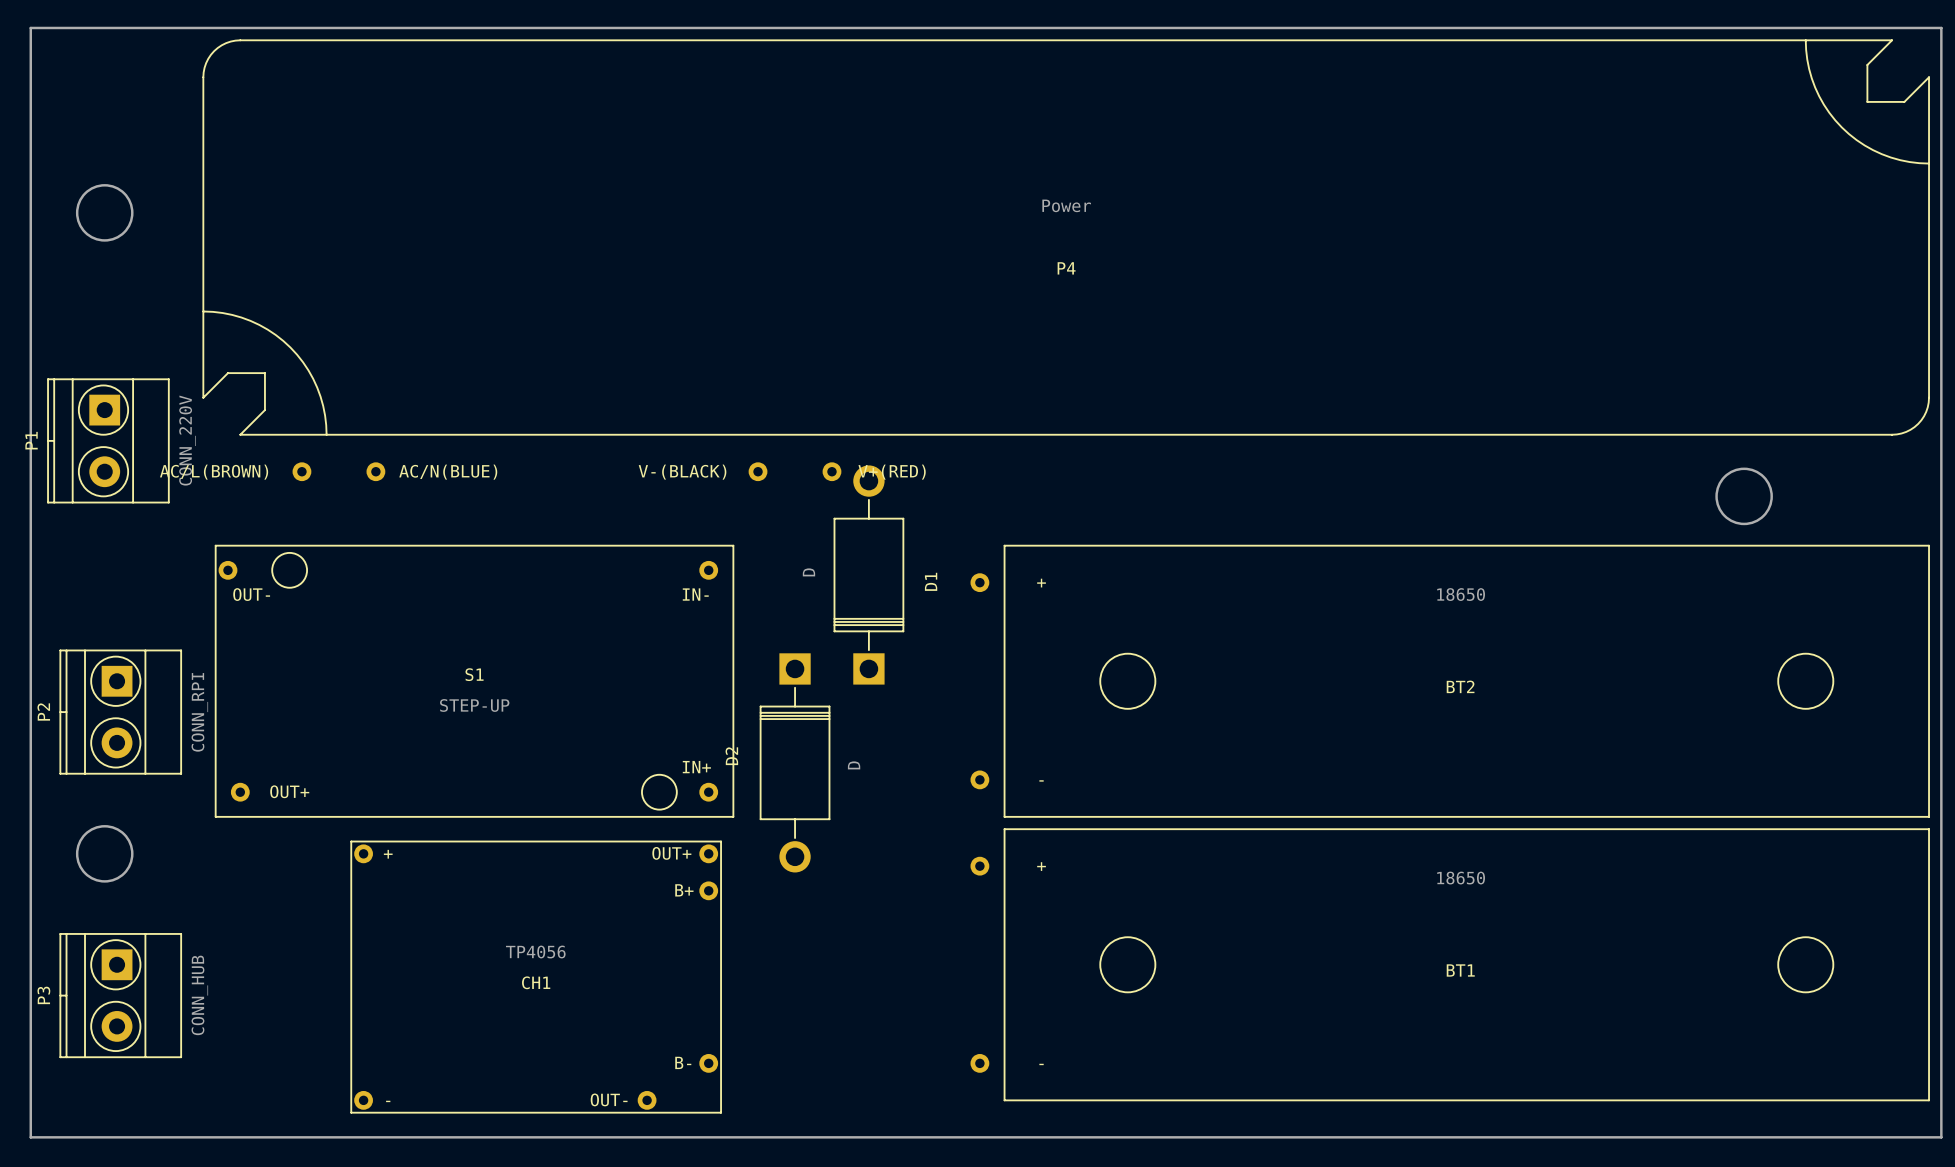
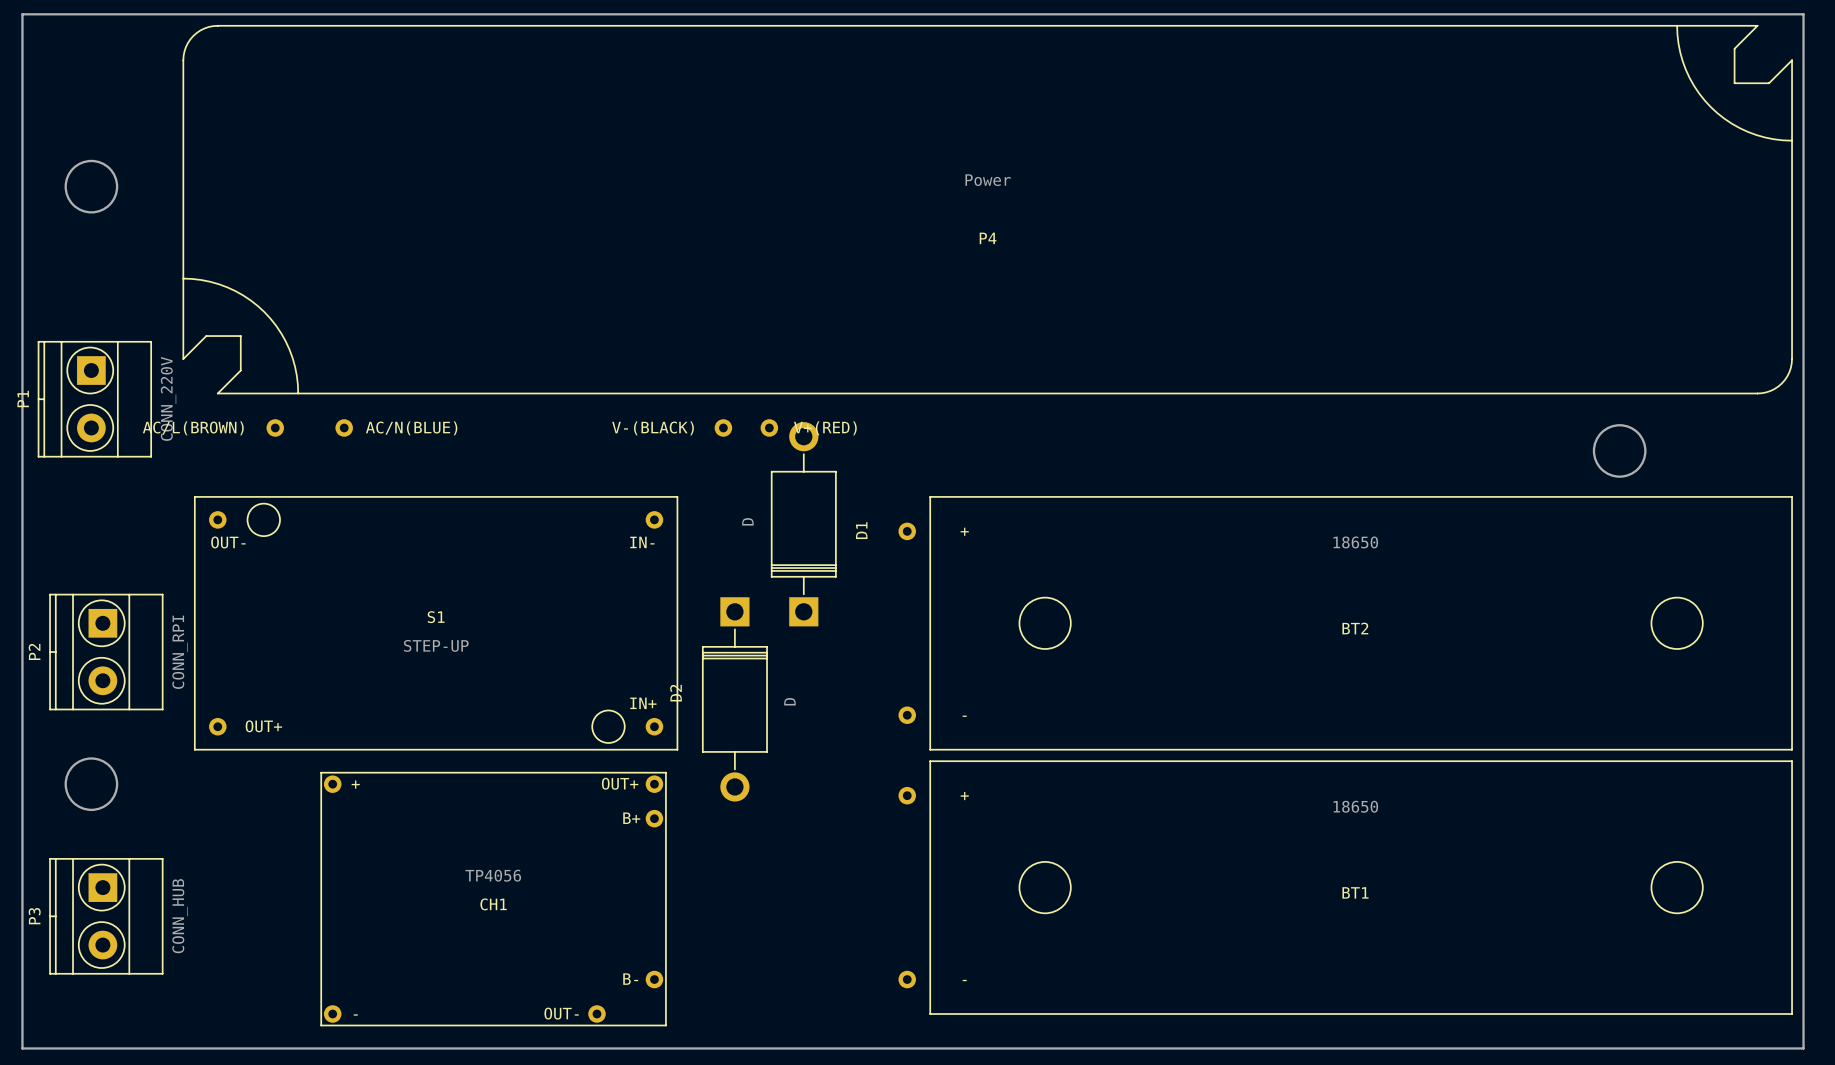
P4 footprint: [202, 39, 1930, 482] -> [182, 24, 1793, 437]
S1 footprint: [214, 544, 735, 818] -> [193, 496, 679, 751]

